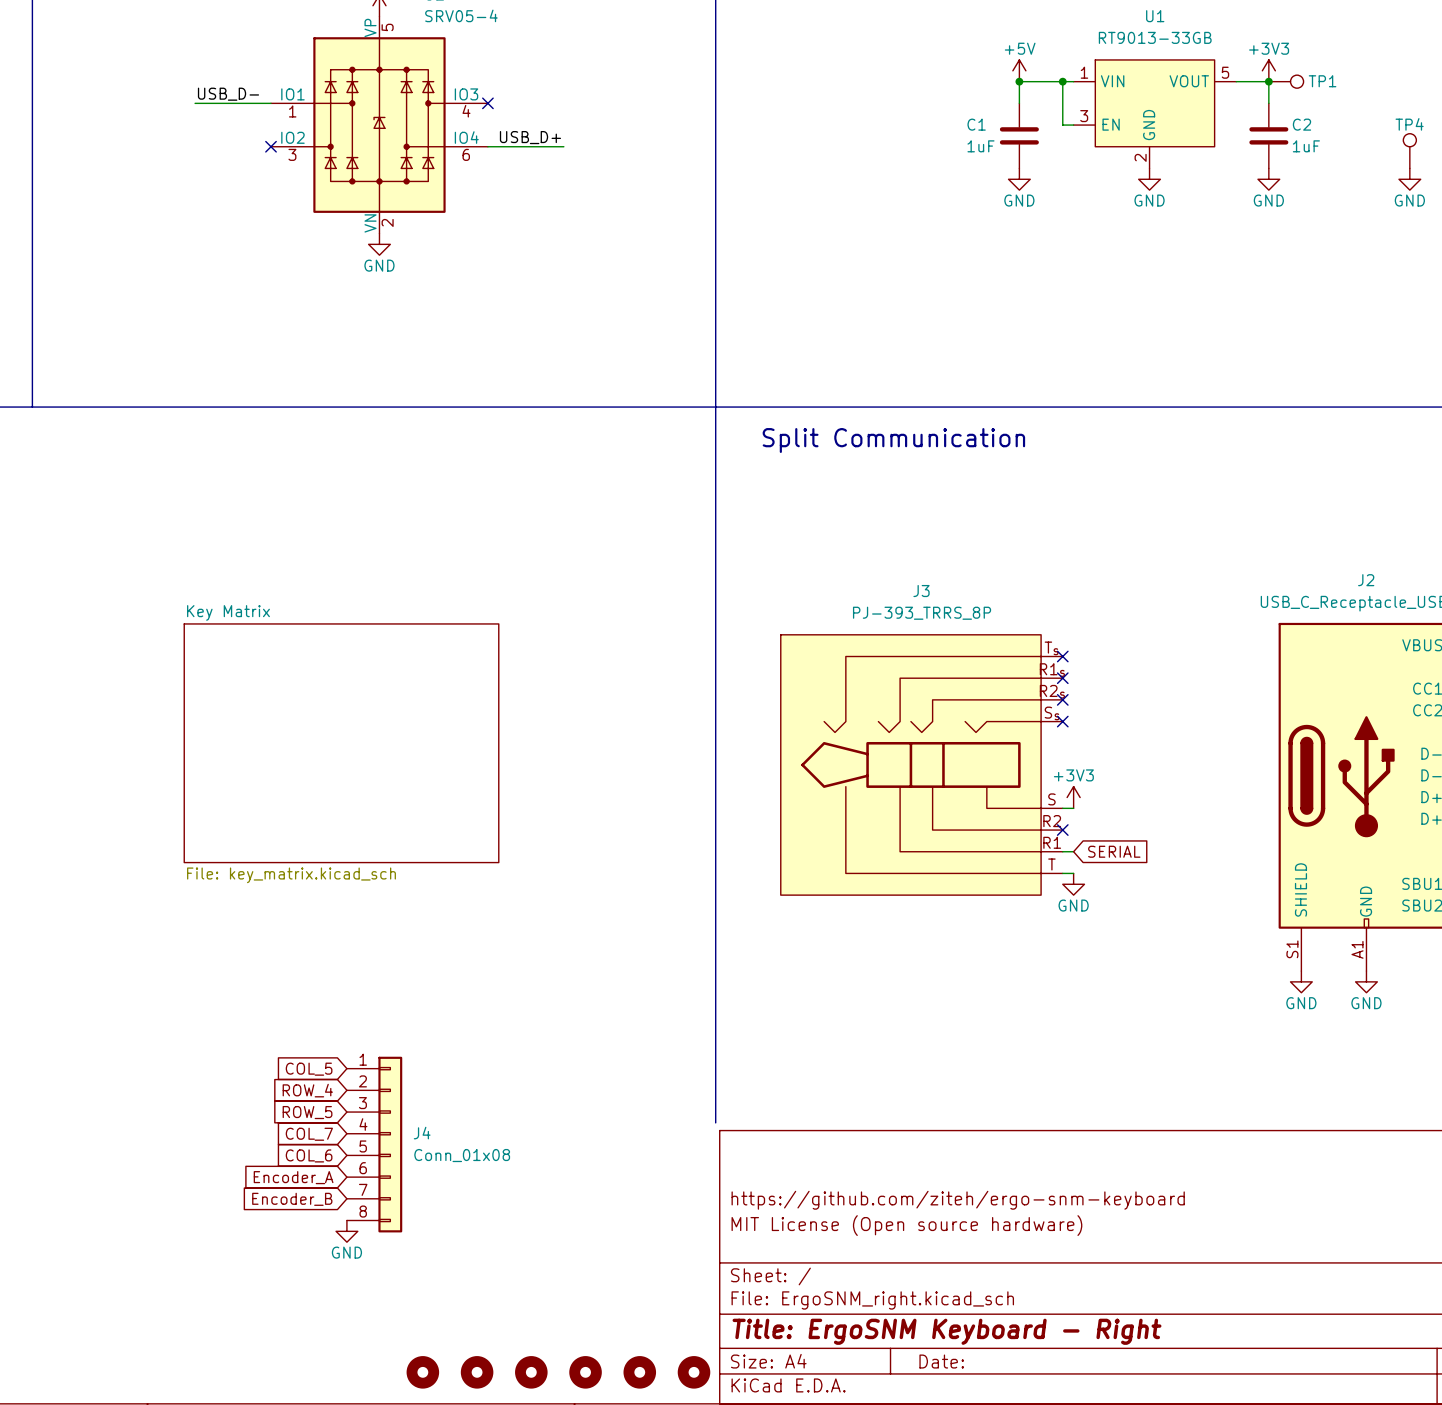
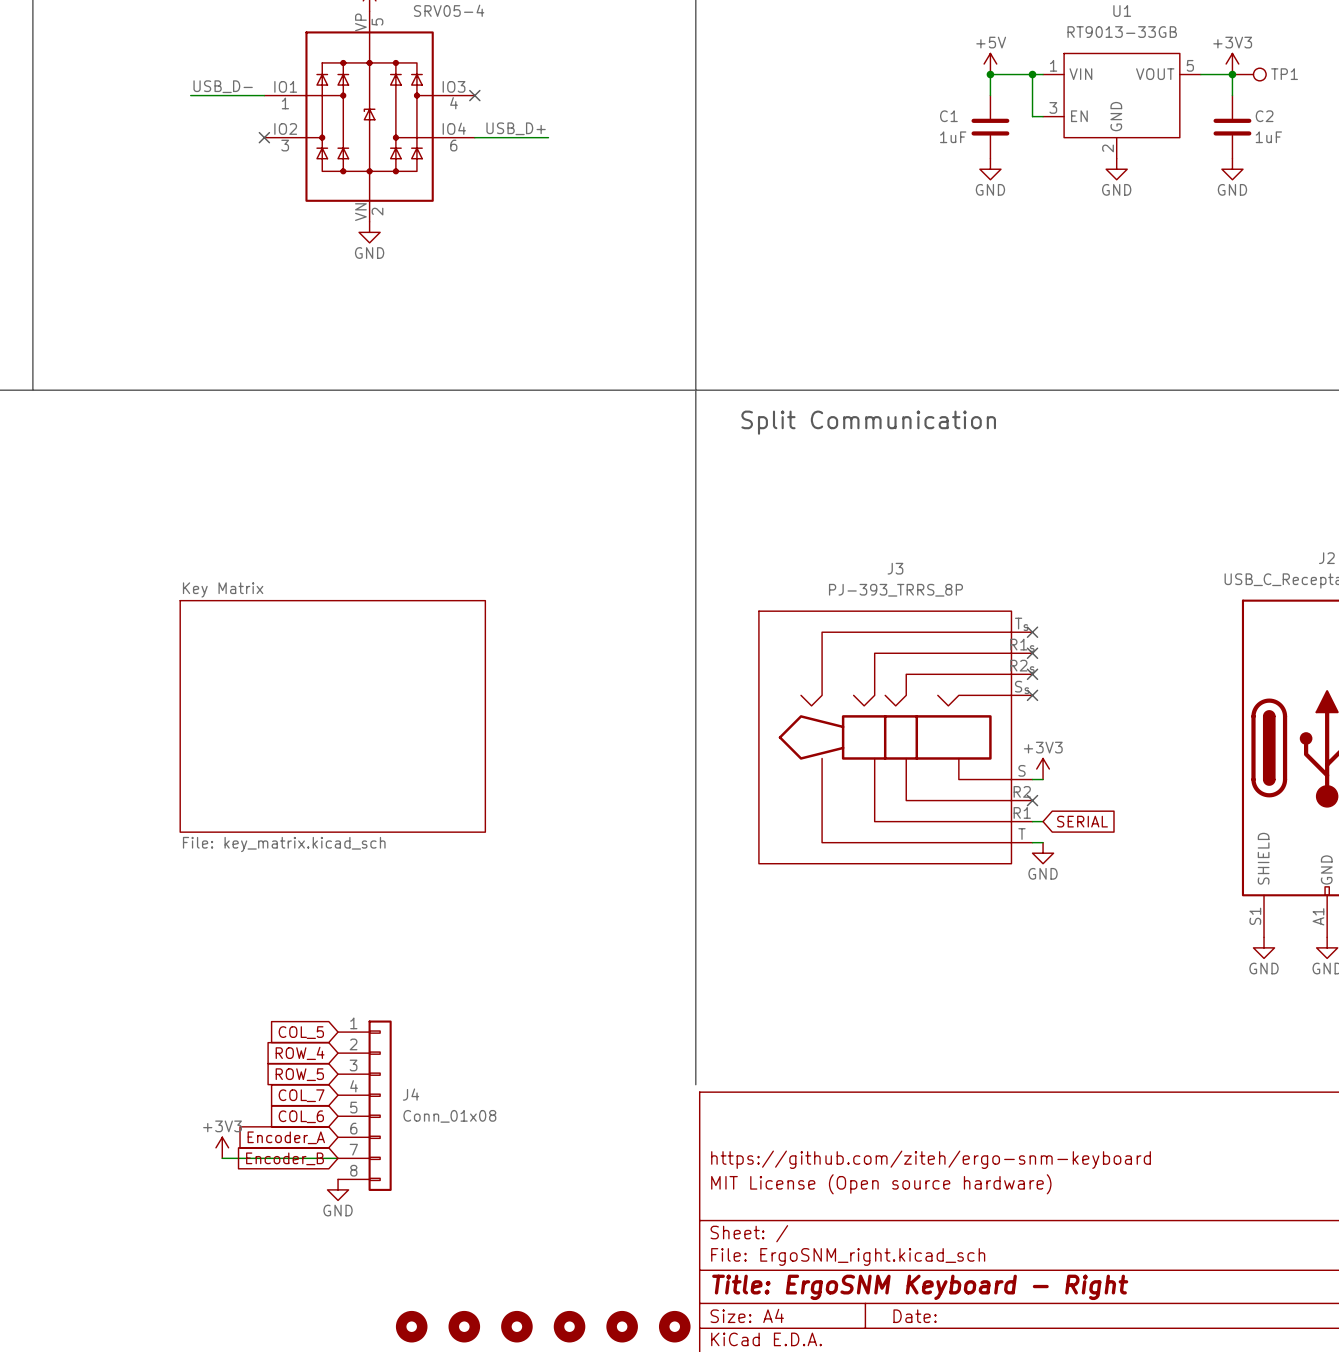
power symbol: none -> +3V3 (222, 1147)
wire: none -> (222, 1158) (338, 1158)

